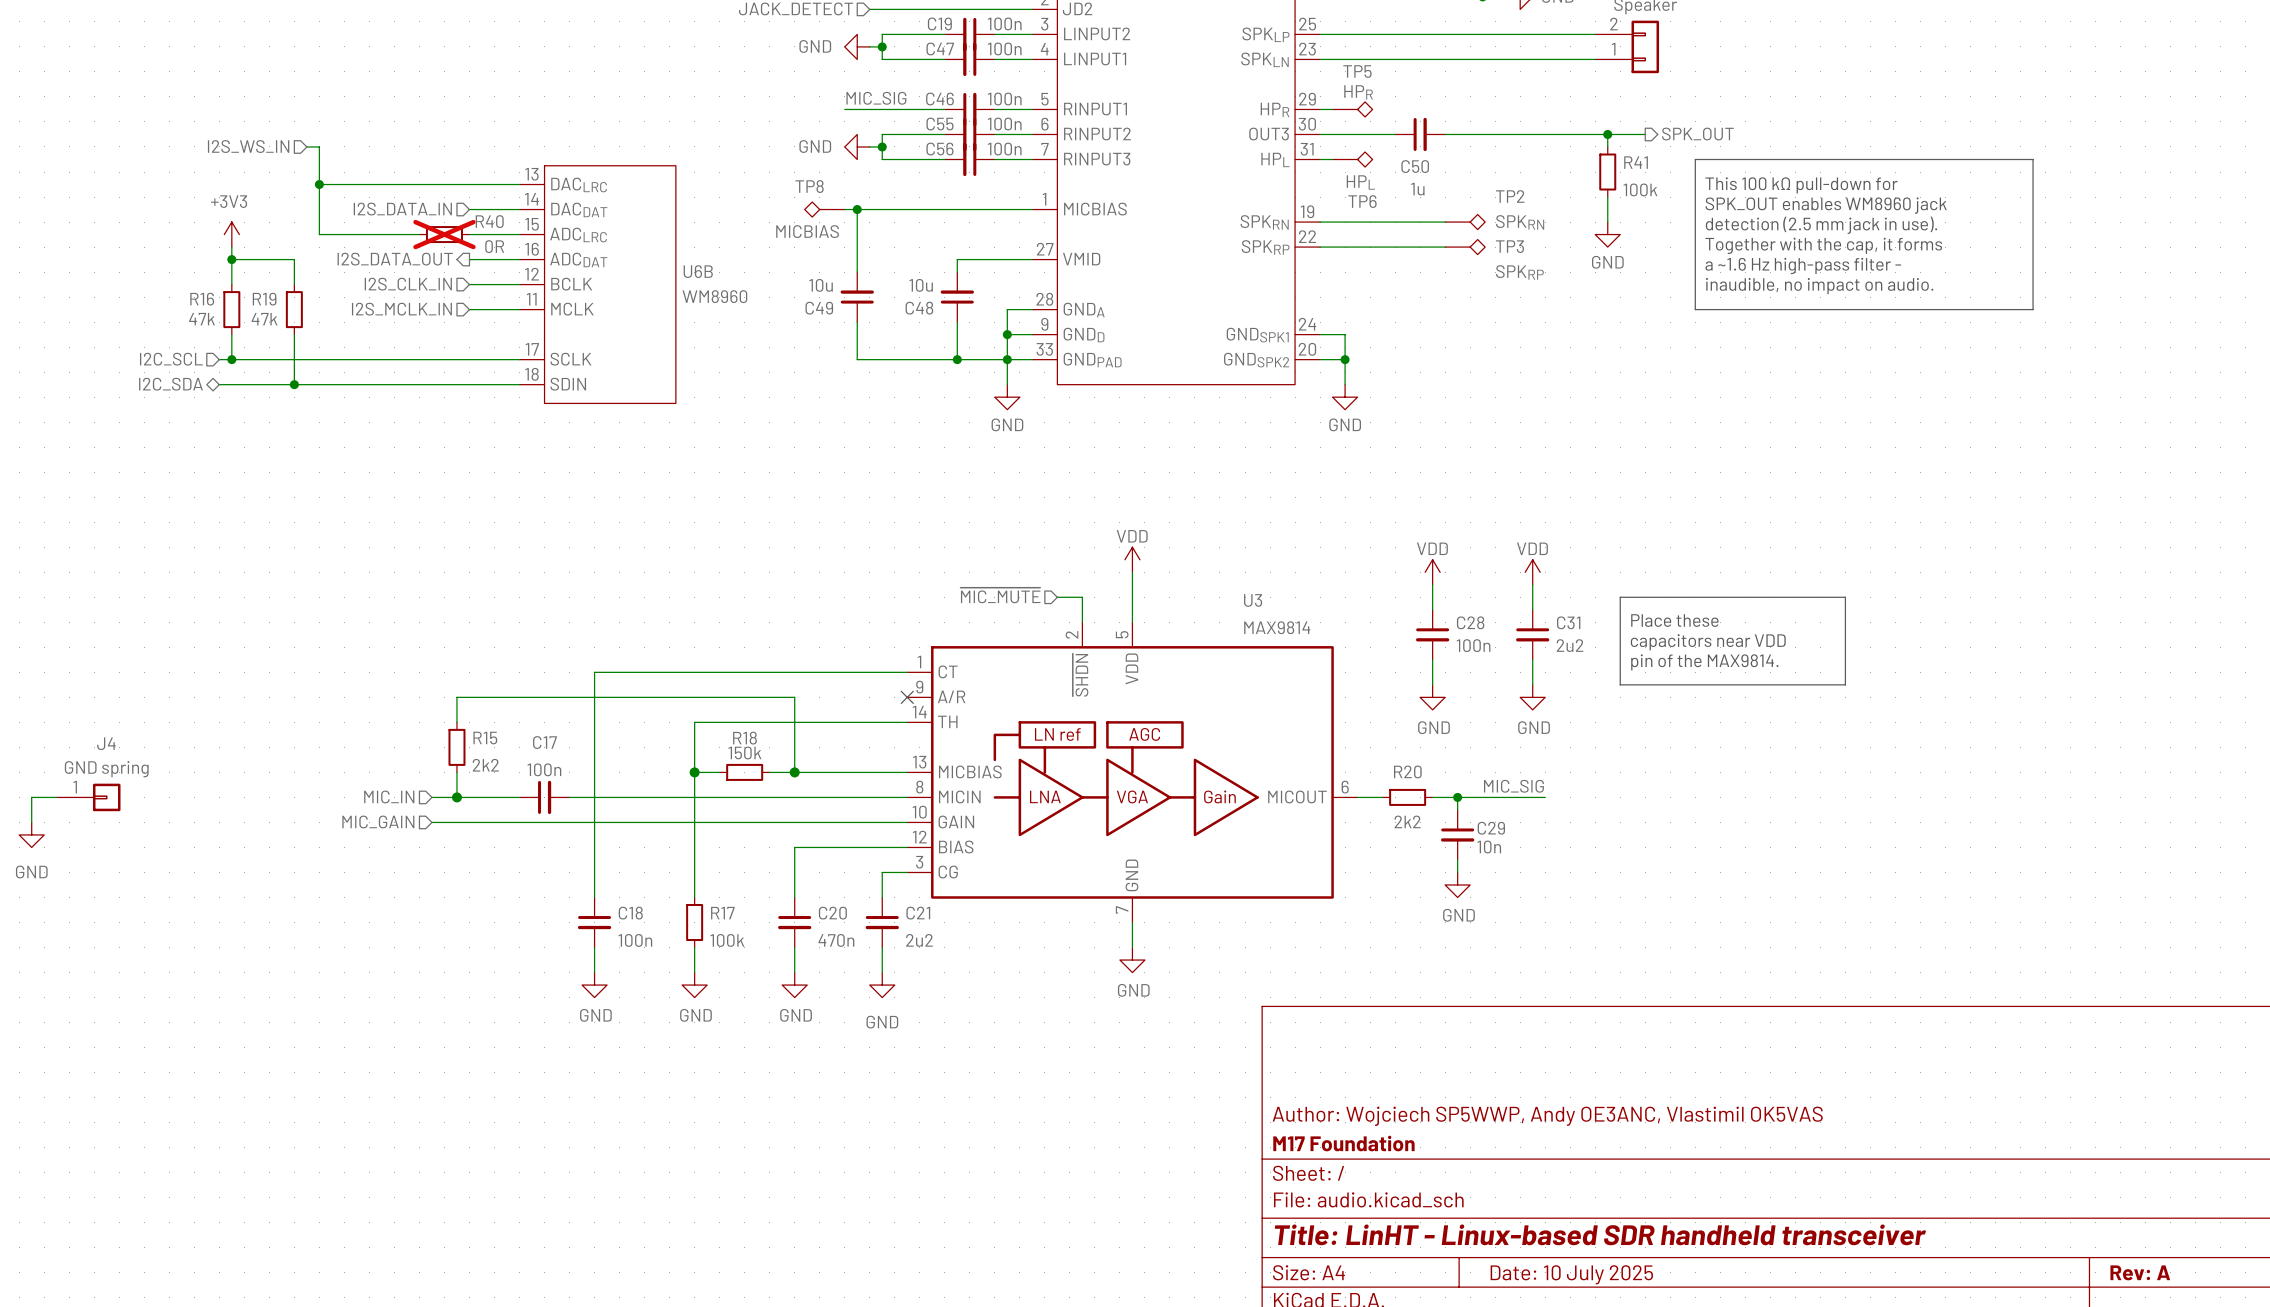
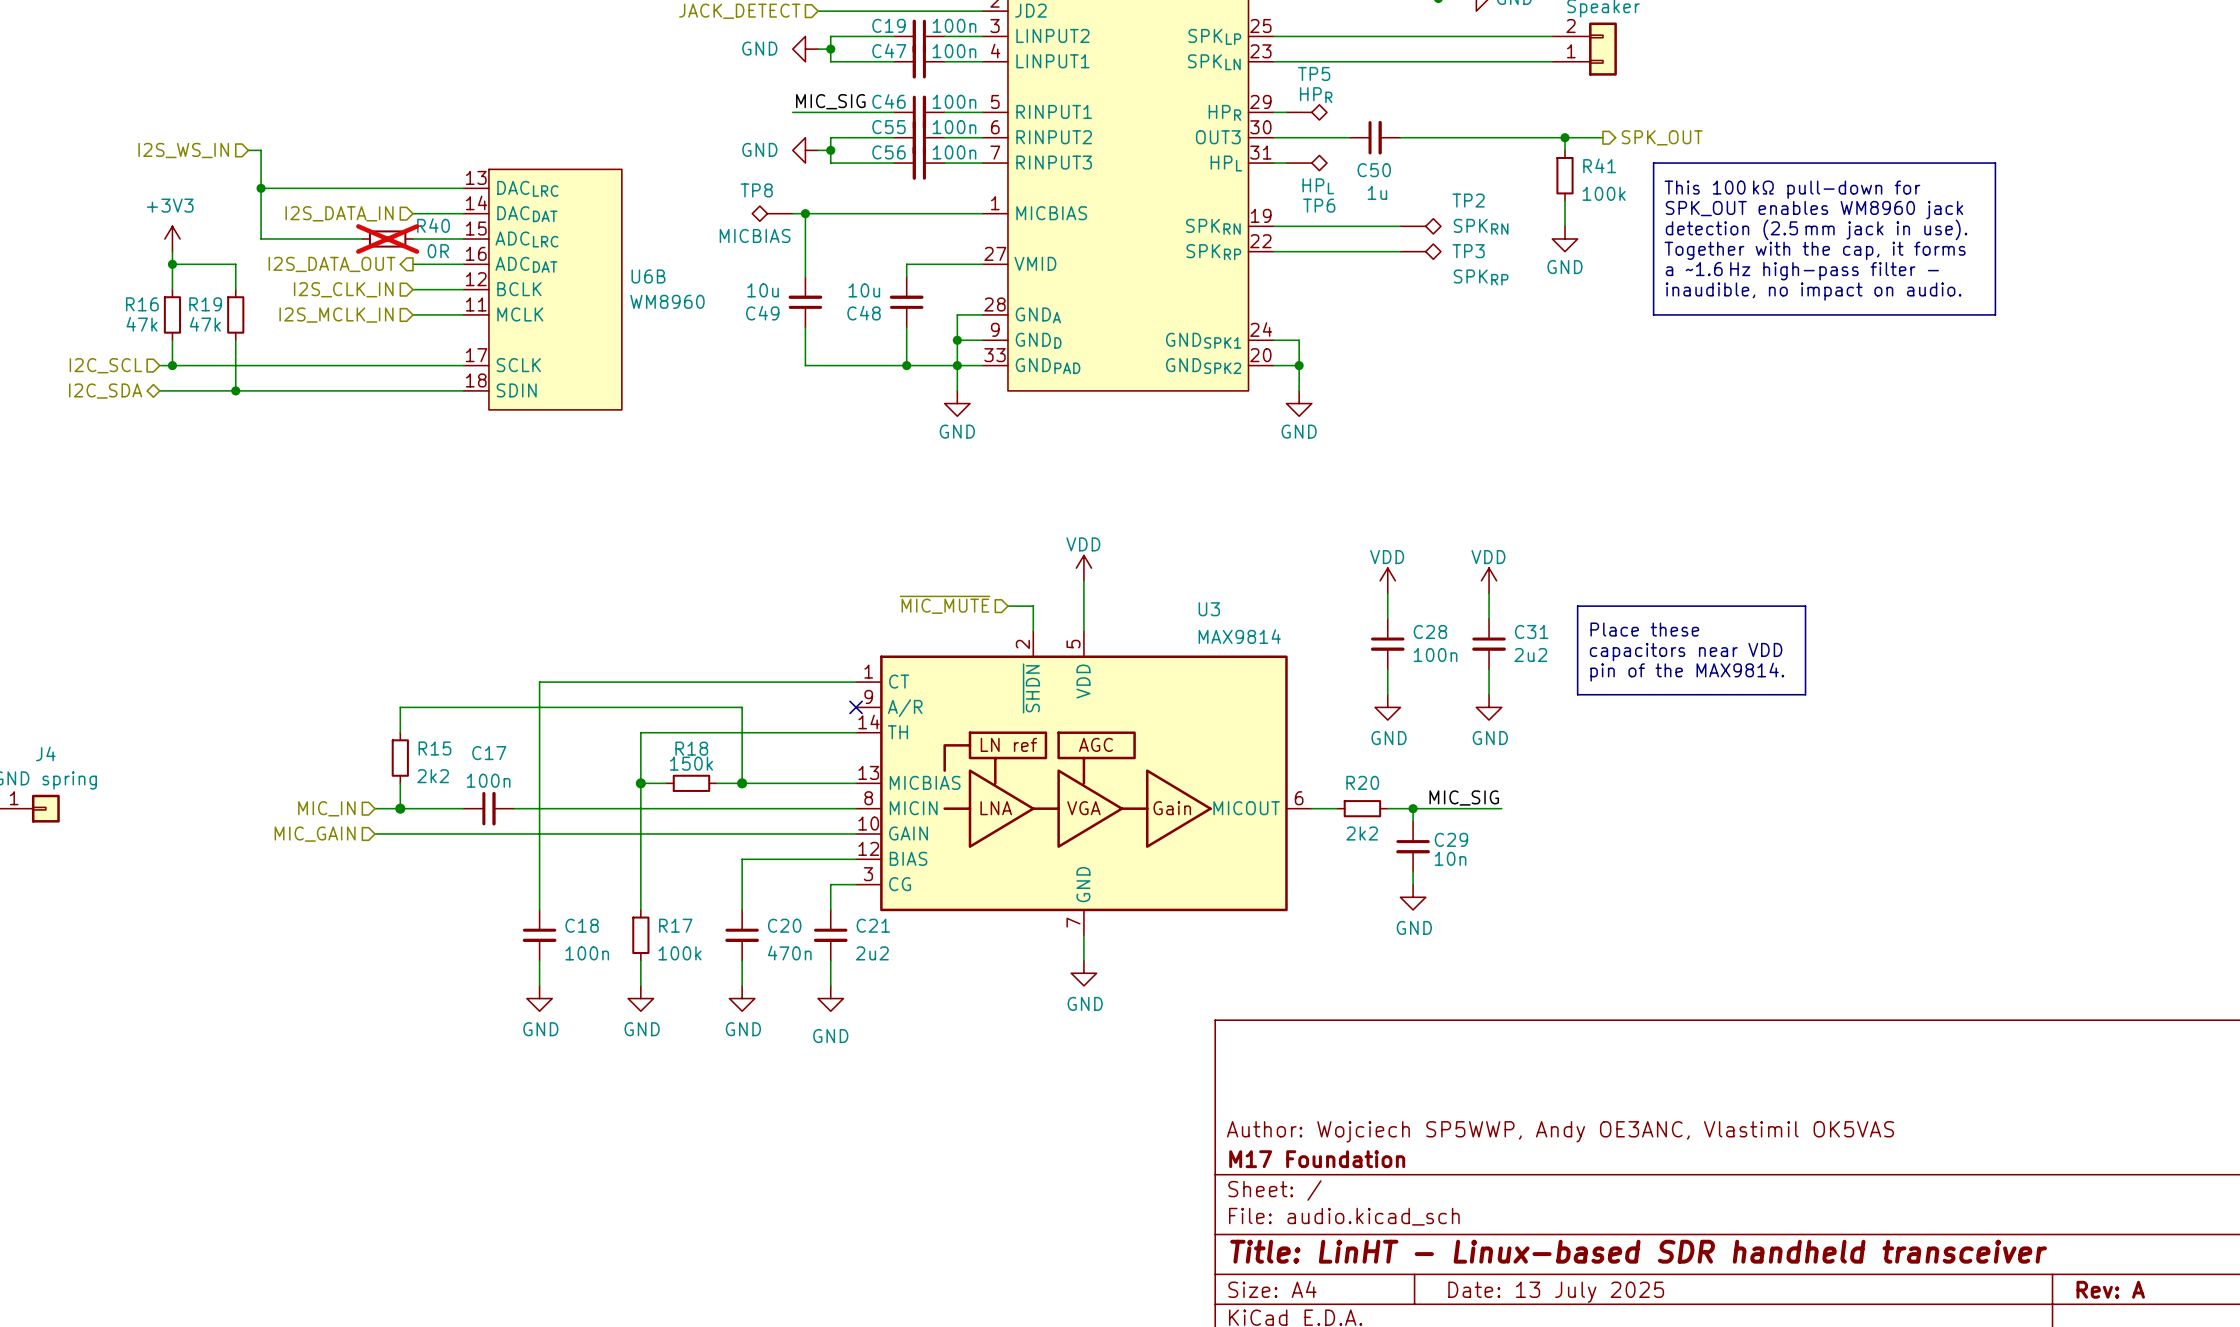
title block: Date: 10 July 2025 (1571, 1274) -> Date: 13 July 2025 (1556, 1292)

